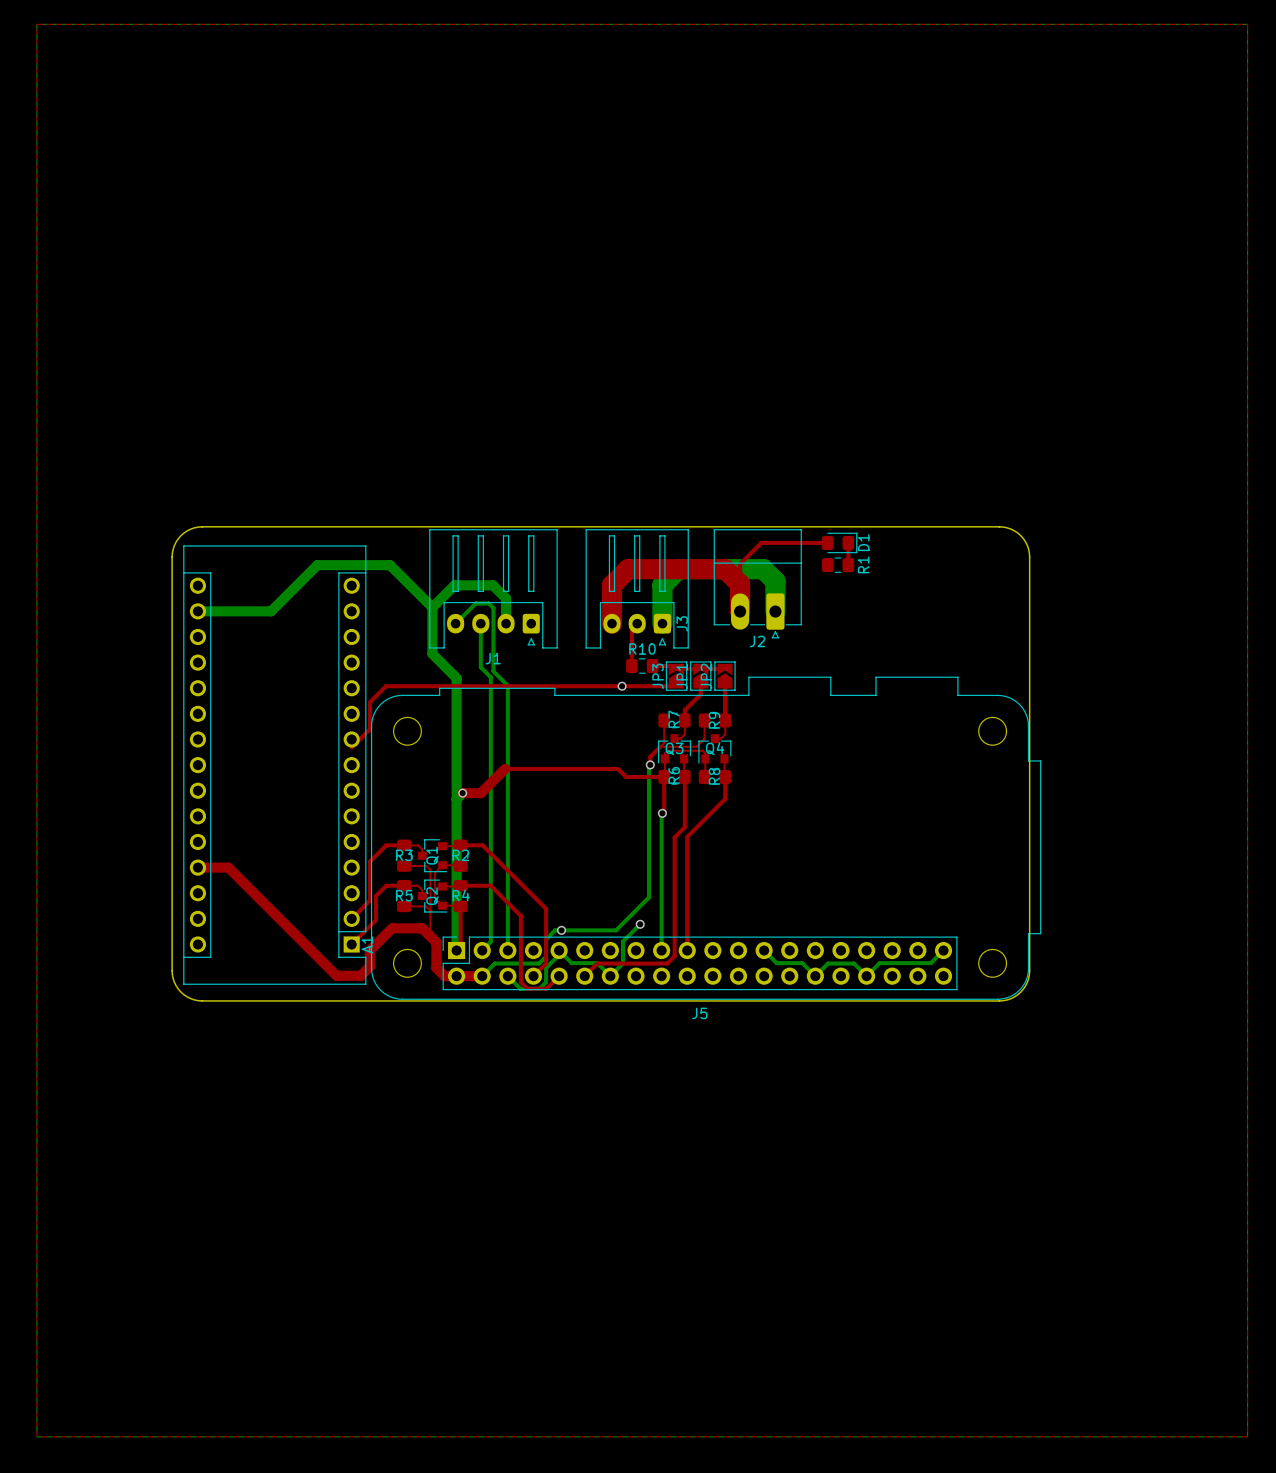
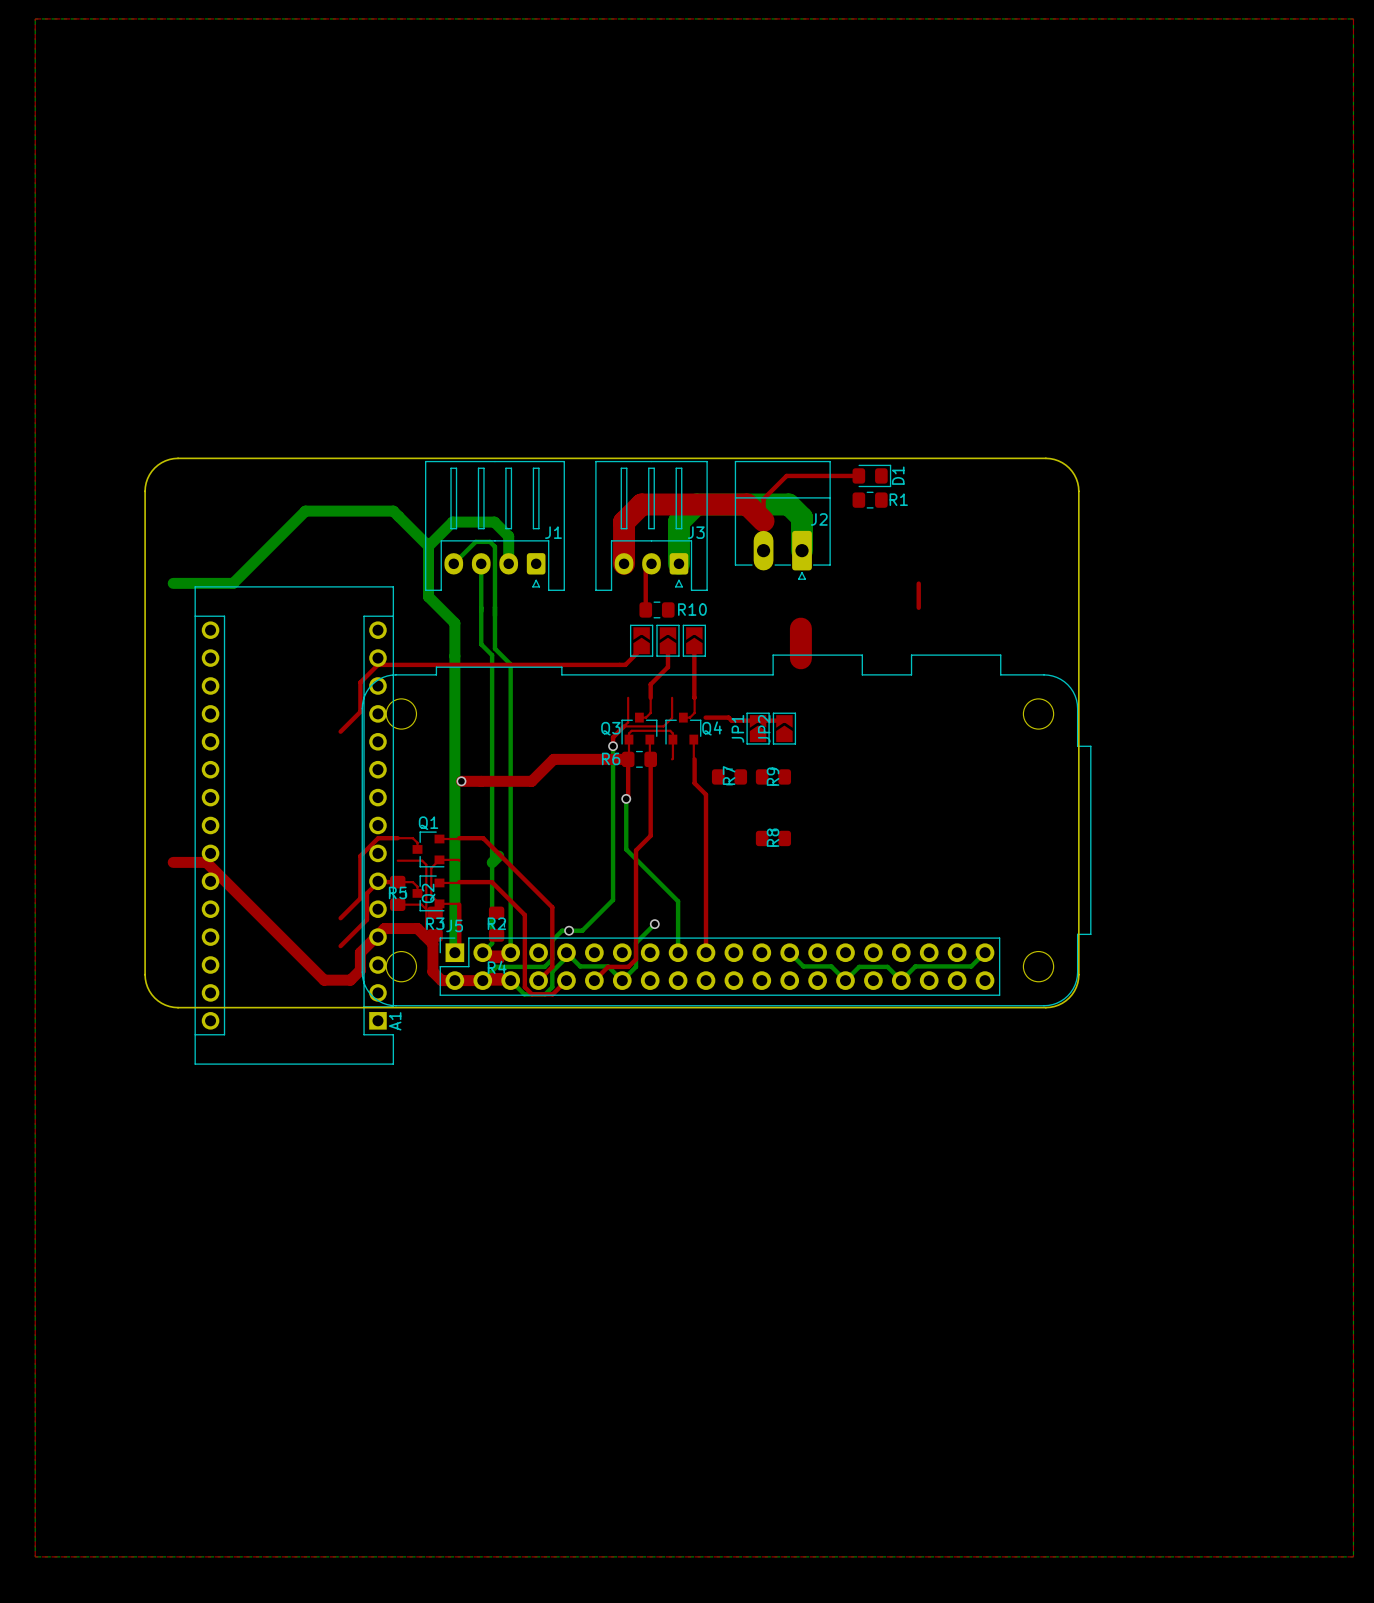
bottom track: none -> (428, 546) (428, 596) (454, 623) (454, 952)
bottom track: none -> (428, 546) (393, 511) (305, 511) (233, 583) (173, 583)
bottom track: none -> (453, 563) (475, 541) (490, 541) (494, 546) (494, 648) (510, 664) (510, 952)
bottom track: none -> (481, 563) (481, 644) (492, 655) (492, 943) (482, 952)
top track: none -> (651, 563) (645, 569) (645, 609)
board edge: (202, 526) (999, 526) (1014, 530) (1025, 541) (1029, 557) (1029, 970) (1025, 985) (1014, 996) (999, 1000) (202, 1000) (187, 996) (176, 985) (172, 970) (172, 557) (174, 545) (180, 535) (190, 529) (202, 526) -> (178, 458) (165, 460) (154, 468) (147, 478) (145, 491) (145, 974) (149, 991) (161, 1003) (178, 1007) (1045, 1007) (1062, 1003) (1074, 991) (1078, 974) (1078, 491) (1074, 474) (1062, 462) (1045, 458) (178, 458)
top track: (827, 542) (761, 542) (740, 564) (740, 584) (724, 569) (628, 569) (611, 585) (611, 623) -> (858, 475) (786, 475) (763, 499) (763, 520) (747, 504) (641, 504) (624, 522) (624, 563)
D1 position: (839, 542) -> (871, 475)
R1 name rotation: 0° (863, 564) -> 90° clockwise (898, 499)
R1 position: (837, 565) -> (870, 500)
J2 position: (757, 583) -> (782, 520)
J1 position: (493, 588) -> (494, 525)
J3 position: (637, 588) -> (651, 525)
part: none -> (641, 640)
part: none -> (667, 640)
part: none -> (694, 640)
top track: none -> (641, 648) (625, 664) (377, 664) (360, 682) (360, 711) (340, 731)
top track: none -> (667, 648) (667, 667) (650, 684) (650, 712) (646, 717) (639, 717)
bottom track: (432, 607) (454, 585) (492, 585) (506, 598) (506, 623) -> (428, 546) (452, 522) (494, 522) (508, 536) (508, 563)
bottom track: (432, 607) (432, 653) (456, 678) (456, 950) -> none
bottom track: (432, 607) (390, 565) (317, 565) (271, 611) (197, 611) -> none
bottom track: (775, 611) (775, 581) (763, 569) (678, 569) (662, 585) (662, 623) -> (802, 550) (802, 517) (788, 504) (696, 504) (678, 522) (678, 563)
bottom track: (455, 623) (475, 603) (488, 603) (493, 608) (493, 671) (507, 685) (507, 950) -> none
bottom track: (480, 623) (480, 667) (490, 677) (490, 941) (482, 950) -> none
top track: (637, 623) (631, 628) (631, 666) -> (694, 648) (694, 712) (689, 717) (683, 717)
J3 name rotation: 0° (682, 623) -> 90° clockwise (696, 532)
J3 name position: J3 (682, 623) -> J3 (696, 532)
J2 name position: J2 (757, 641) -> J2 (819, 519)
R10 name position: R10 (642, 649) -> R10 (692, 609)
J1 name position: J1 (493, 658) -> J1 (553, 532)
R10 position: (642, 666) -> (657, 609)
JP3: (676, 676) -> none
top track: (676, 683) (673, 686) (385, 686) (369, 702) (369, 729) (351, 747) -> none
top track: (700, 683) (700, 694) (684, 710) (684, 734) (680, 738) (674, 738) -> none
top track: (724, 683) (725, 734) (720, 738) (714, 738) -> none
top track: none -> (649, 739) (650, 835) (636, 850) (636, 959) (628, 966) (608, 966) (594, 980)
via: (622, 686) -> none
top track: none -> (693, 739) (694, 783) (705, 794) (705, 952)
via: none -> (613, 746)
bottom track: none -> (611, 747) (613, 746) (613, 899) (582, 930) (562, 930) (552, 940) (552, 959) (544, 966) (496, 966) (482, 980)
top track: none -> (628, 759) (553, 759) (531, 781) (461, 781)
top track: (664, 720) (664, 742) (660, 746) -> (628, 697) (628, 722) (624, 726)
top track: (704, 720) (704, 738) (696, 746) (660, 746) -> (672, 697) (672, 717) (663, 726) (624, 726)
via: none -> (461, 781)
via: none -> (626, 798)
bottom track: none -> (625, 799) (626, 849) (678, 901) (678, 952)
top track: (660, 746) (650, 756) (650, 764) -> (624, 726) (613, 737) (613, 746)
Q3 position: (674, 748) -> (639, 728)
Q3 name position: Q3 (674, 748) -> Q3 (610, 728)
Q4 position: (714, 748) -> (683, 728)
Q4 name position: Q4 (715, 748) -> Q4 (712, 728)
top track: (684, 758) (684, 827) (674, 837) (674, 956) (667, 963) (597, 963) (584, 976) -> none
top track: (724, 758) (725, 798) (687, 836) (687, 950) -> none
bottom track: (650, 764) (649, 897) (616, 930) (555, 930) (546, 939) (546, 956) (539, 963) (494, 963) (482, 976) -> none
via: (650, 764) -> none
R6 name rotation: 0° (674, 775) -> 90° clockwise (611, 758)
R6 name position: R6 (674, 775) -> R6 (611, 758)
top track: (664, 777) (664, 811) (662, 813) -> (628, 759) (628, 796) (626, 798)
top track: (664, 777) (664, 753) (667, 750) (702, 750) (705, 753) (704, 777) -> (628, 759) (628, 733) (631, 730) (670, 730) (672, 733) (672, 759)
top track: (664, 777) (626, 777) (618, 768) (505, 768) (480, 793) (462, 793) -> none
R6 position: (674, 777) -> (639, 759)
via: (462, 793) -> none
bottom track: (662, 813) (661, 950) -> none
via: (662, 813) -> none
J5 position: (706, 838) -> (726, 830)
top track: (442, 846) (482, 845) (546, 908) (546, 963) (533, 976) -> (439, 839) (483, 838) (552, 907) (552, 966) (538, 980)
top track: (422, 855) (422, 849) (418, 845) (386, 845) (369, 861) (369, 900) (351, 918) -> (417, 849) (417, 842) (412, 838) (378, 838) (360, 856) (360, 898) (340, 918)
Q1 position: (432, 855) -> (428, 849)
Q1 name rotation: 0° (432, 855) -> 90° clockwise (428, 823)
via: none -> (654, 924)
via: none -> (569, 930)
top track: (404, 866) (426, 866) (430, 869) (430, 932) (428, 934) -> (397, 860) (422, 860) (426, 864) (426, 932) (424, 935)
top track: (460, 866) (442, 865) (434, 872) (434, 898) (442, 905) (460, 906) (460, 946) (456, 950) -> (459, 860) (439, 859) (431, 868) (431, 895) (439, 903) (459, 904) (459, 948) (454, 952)
top track: (197, 867) (228, 867) (336, 975) (360, 975) (369, 966) (369, 950) (392, 928) (422, 928) (436, 942) (436, 968) (444, 976) (482, 976) -> (173, 862) (206, 862) (324, 980) (350, 980) (360, 970) (360, 952) (384, 928) (417, 928) (432, 943) (432, 971) (441, 980) (482, 980)
top track: (442, 886) (490, 885) (520, 915) (520, 982) (527, 988) (546, 988) (559, 976) -> (439, 882) (491, 882) (524, 915) (524, 987) (531, 994) (552, 994) (566, 981)
R5 position: (404, 896) -> (397, 893)
top track: (422, 896) (422, 890) (418, 885) (386, 885) (375, 896) (375, 920) (351, 944) -> (417, 893) (417, 886) (412, 882) (378, 882) (366, 893) (366, 919) (340, 946)
Q2 position: (432, 896) -> (428, 893)
top track: (404, 906) (425, 906) (430, 910) -> (397, 904) (421, 904) (426, 909)
bottom track: (640, 924) (622, 941) (622, 963) (610, 976) (597, 963) (571, 963) (559, 950) (559, 954) (546, 967) (546, 982) (539, 988) (520, 988) (507, 976) -> (654, 924) (636, 942) (636, 966) (622, 980) (608, 966) (580, 966) (566, 952) (566, 957) (552, 971) (552, 987) (545, 994) (524, 994) (510, 980)
via: (640, 924) -> none
via: (561, 930) -> none
bottom track: (764, 950) (776, 963) (802, 963) (815, 976) (827, 963) (854, 963) (866, 976) (879, 963) (930, 963) (943, 950) -> (789, 952) (803, 966) (831, 966) (845, 980) (859, 966) (887, 966) (901, 980) (915, 966) (971, 966) (985, 952)
J5 name position: J5 (699, 1013) -> J5 (454, 925)

